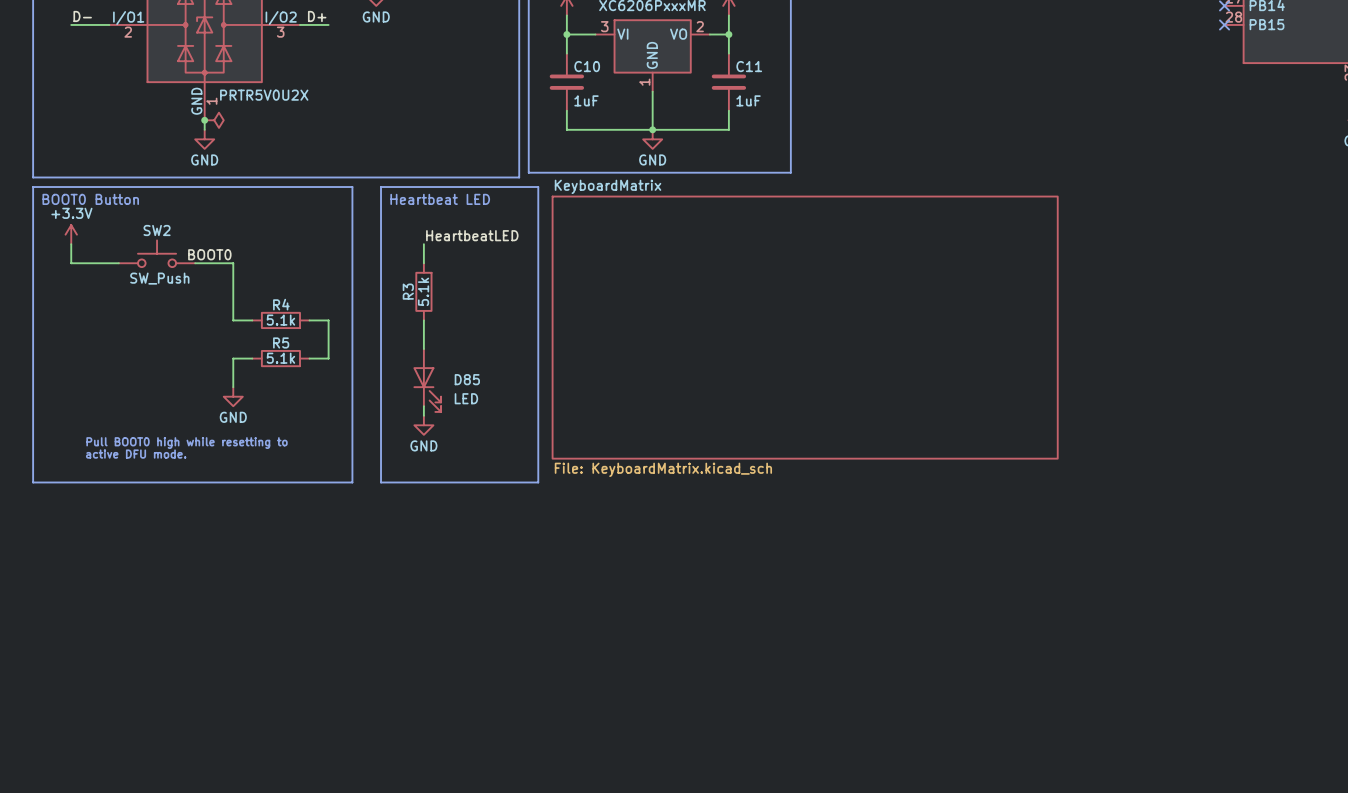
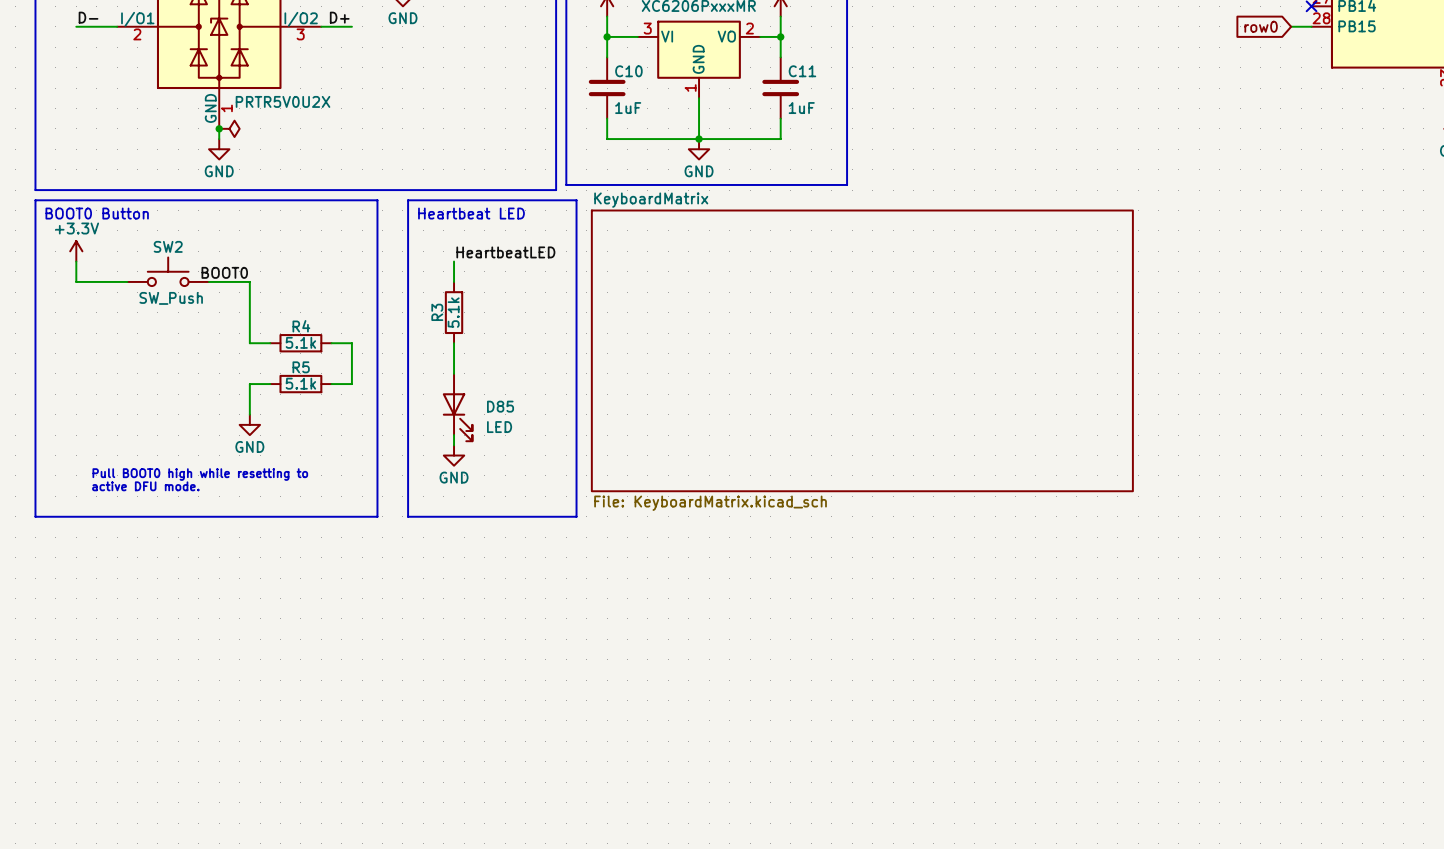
global label: none -> row0 (1261, 26)
wire: none -> (1291, 26) (1311, 26)
no-connect mark: (1224, 24) -> none

